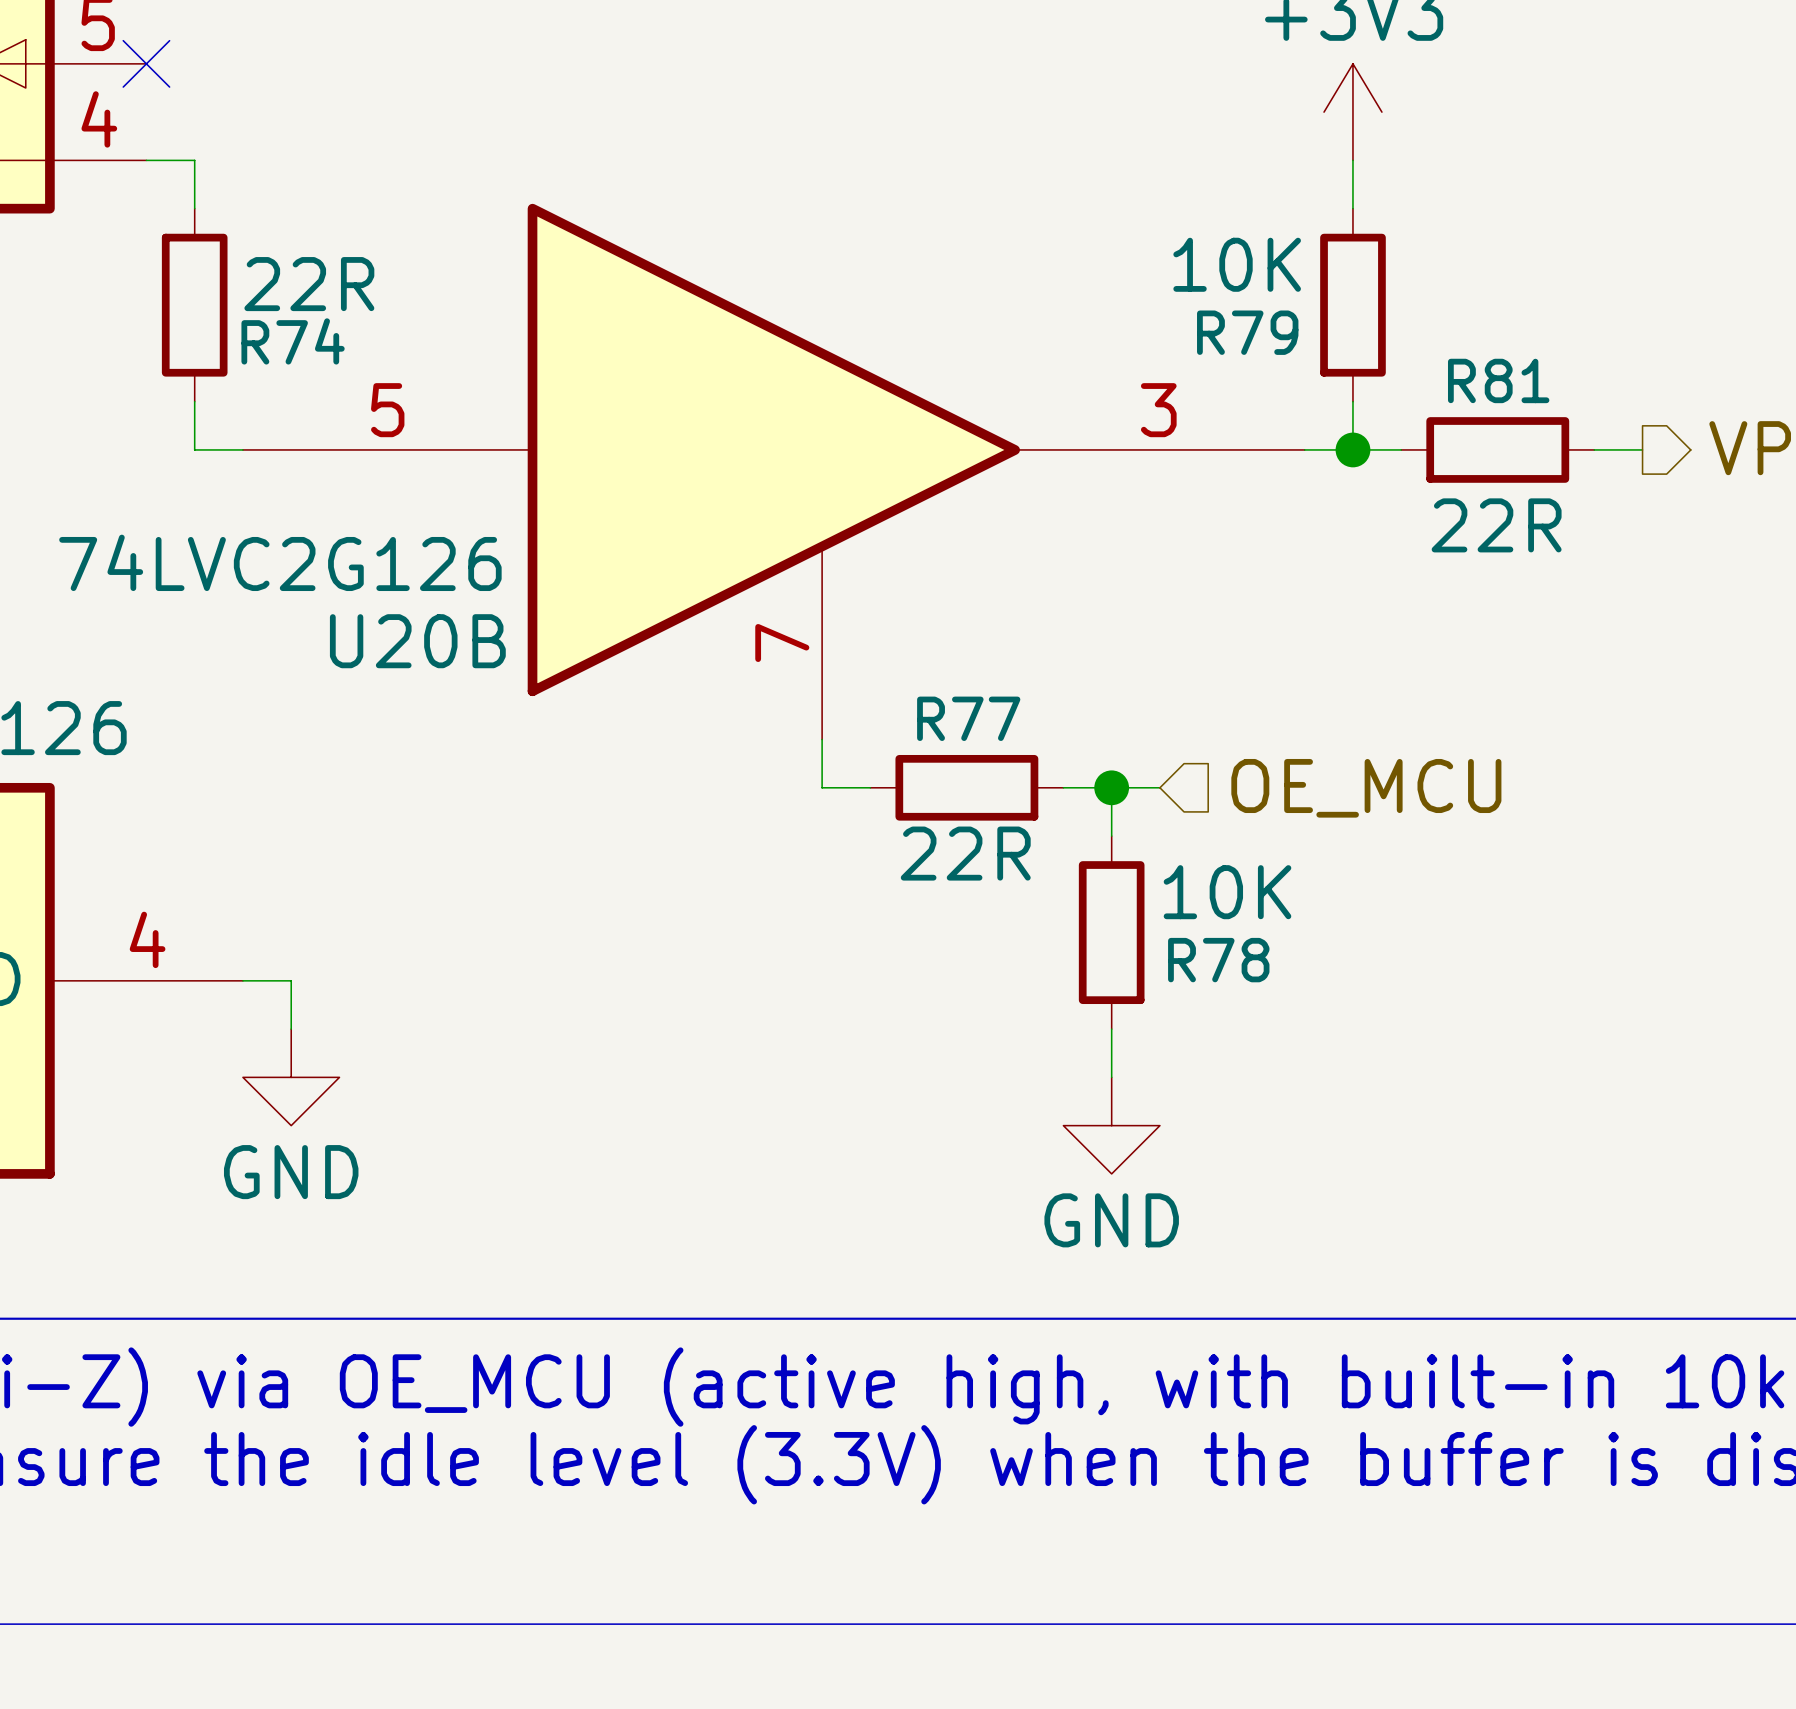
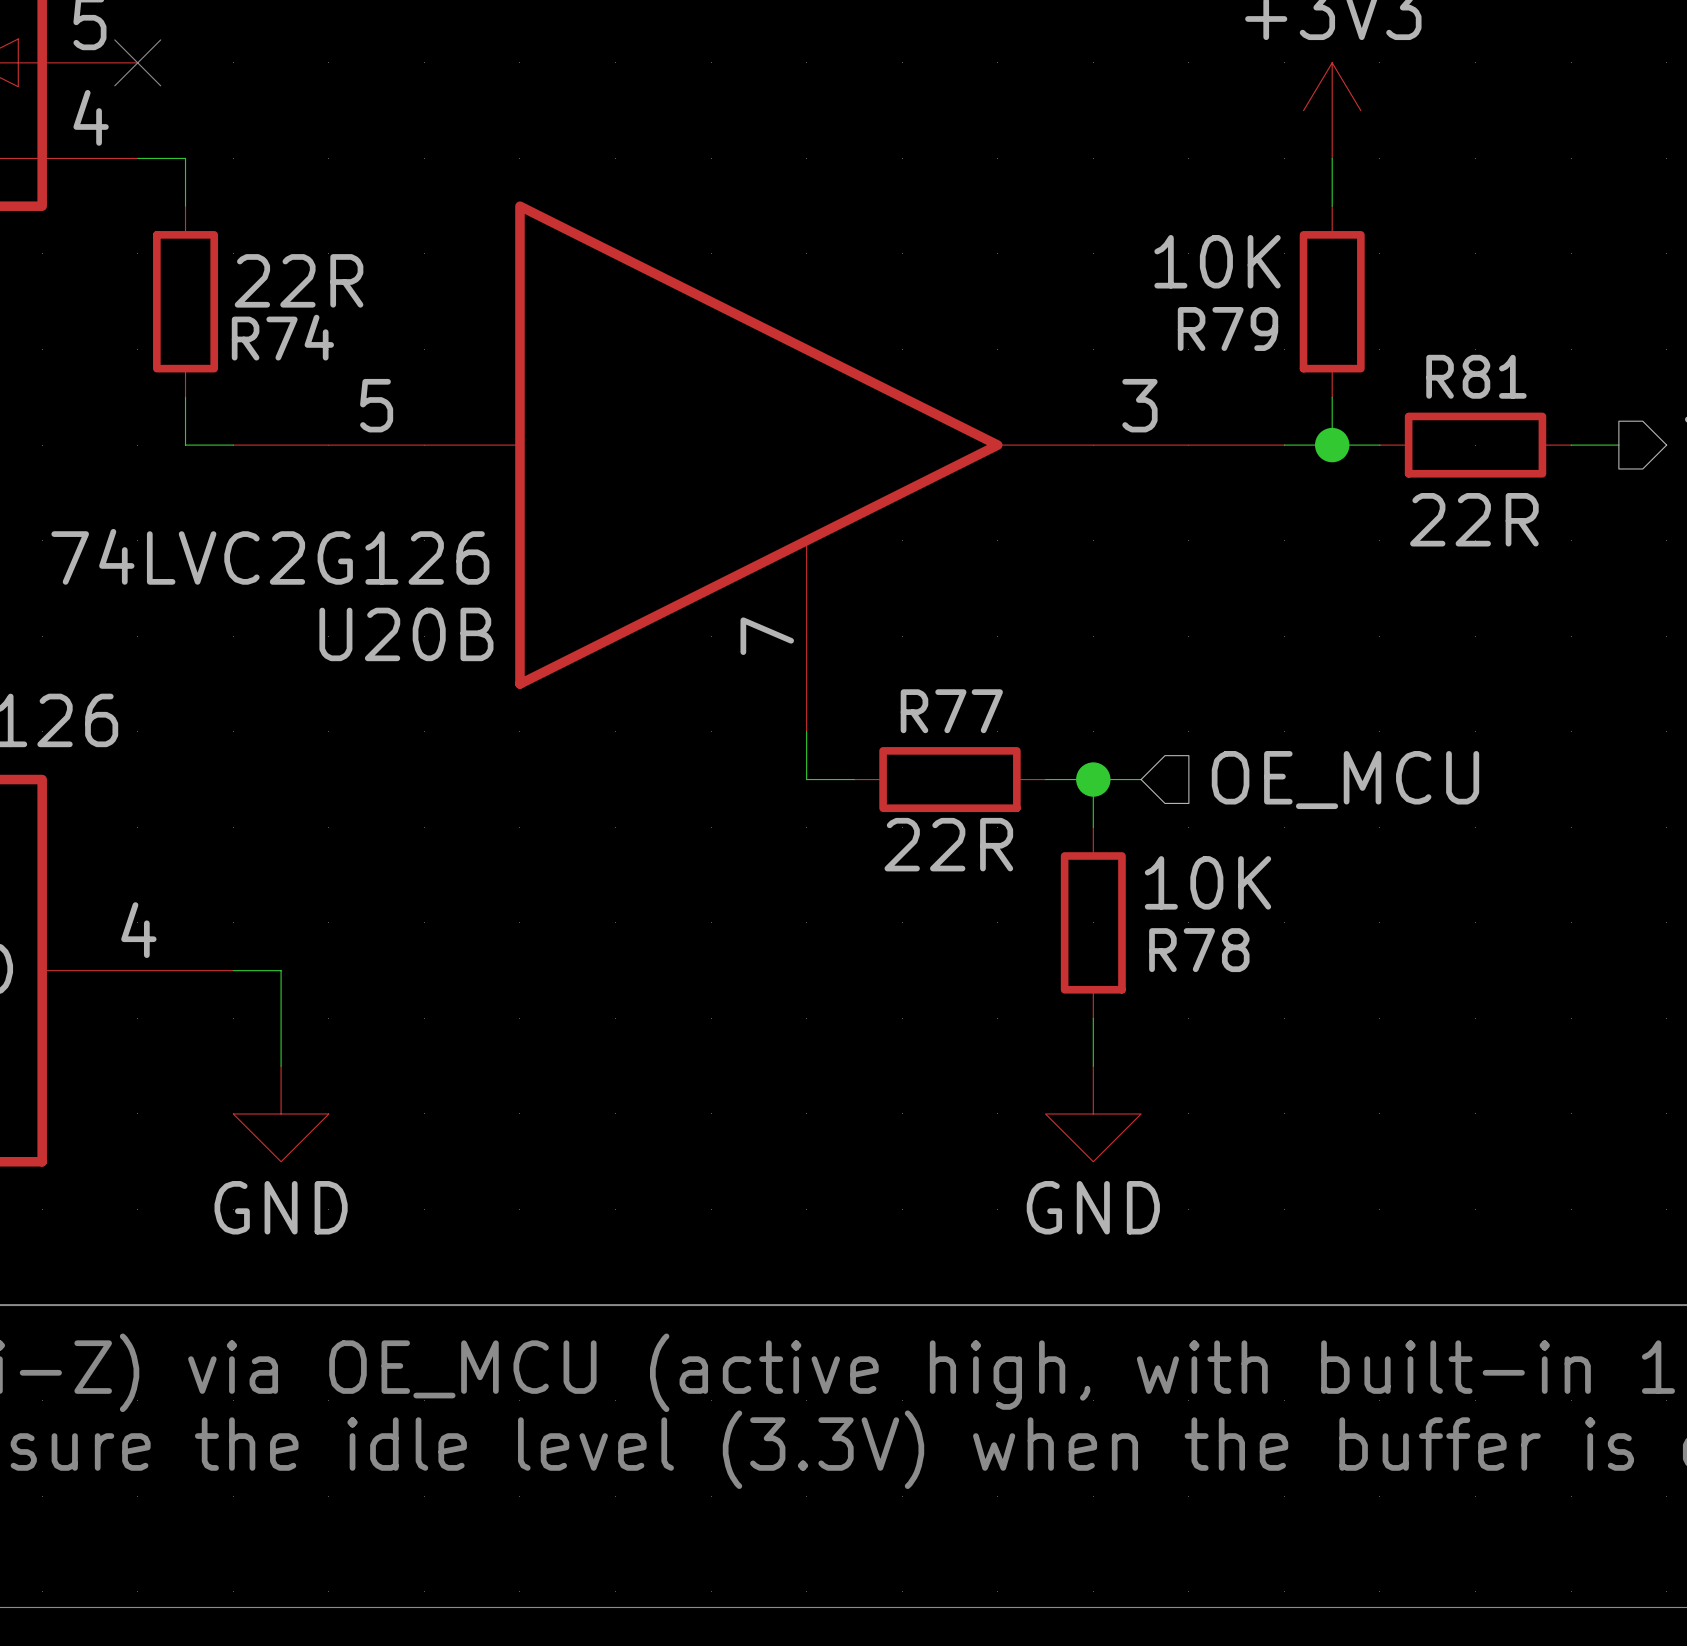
power symbol position: GND (291, 1077) -> GND (281, 1113)

